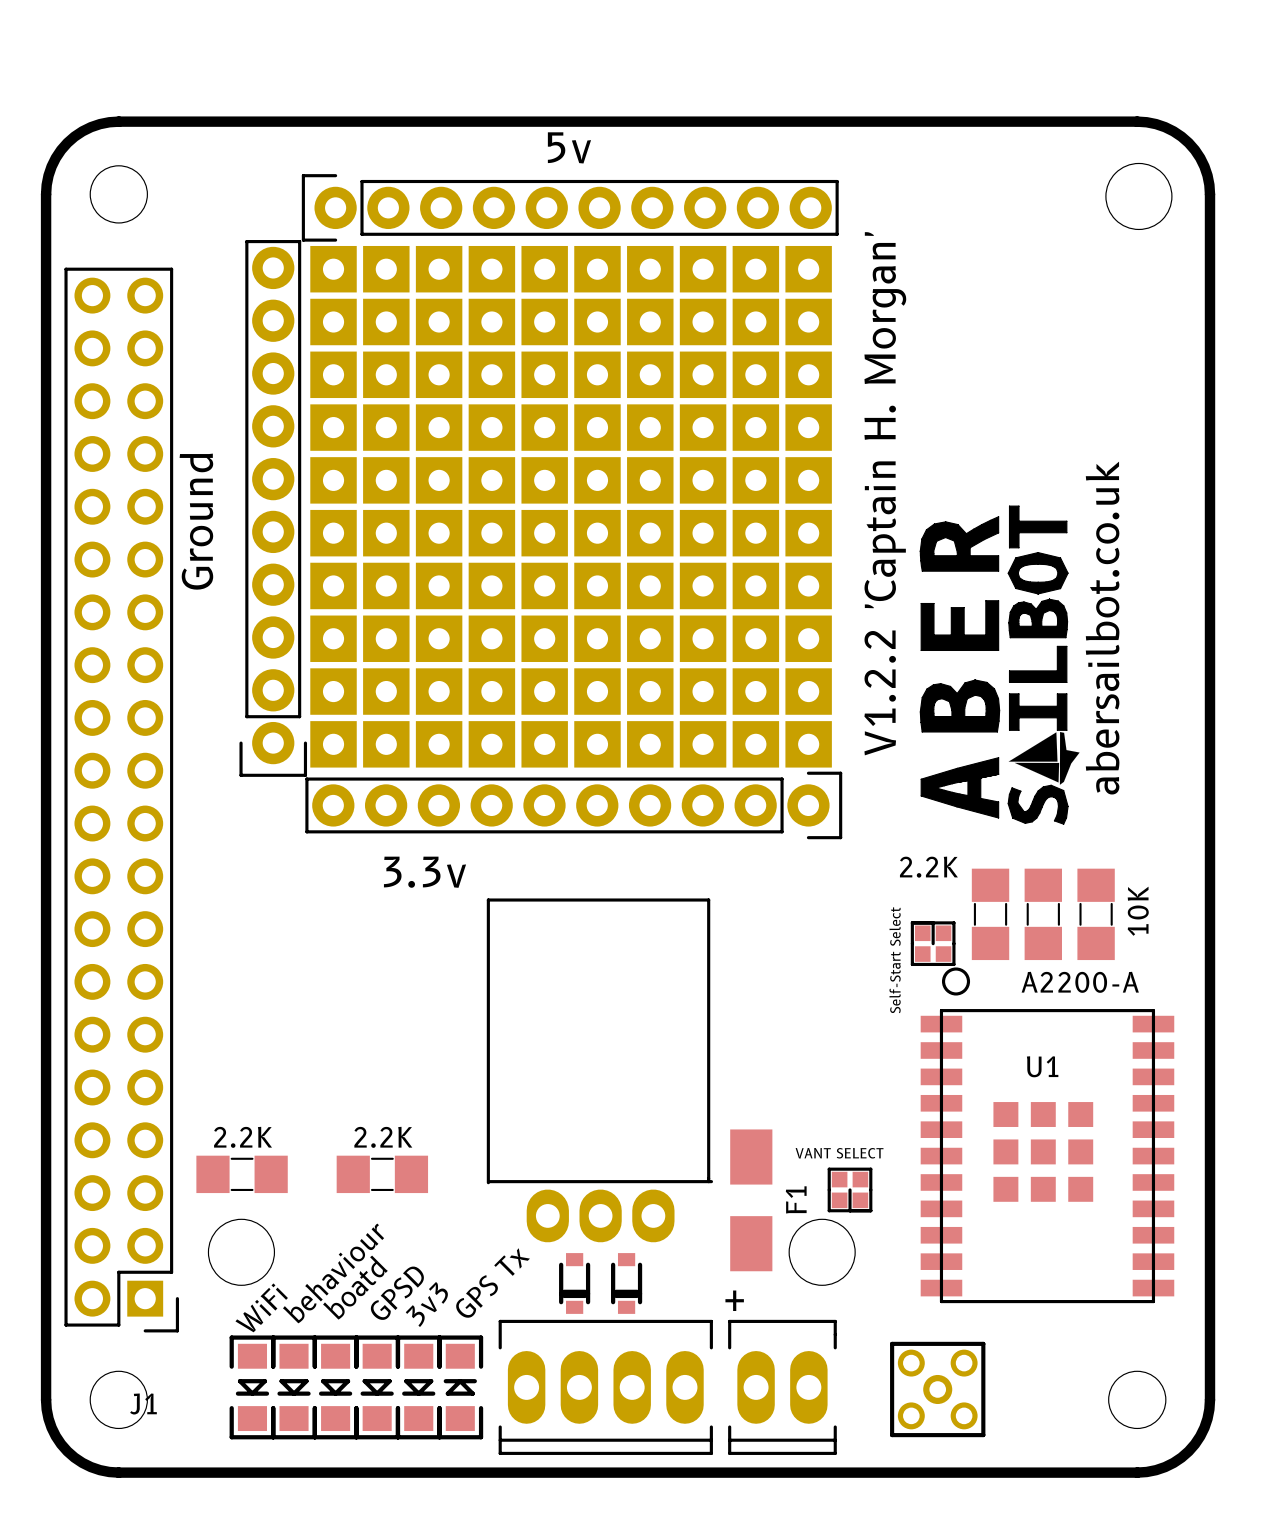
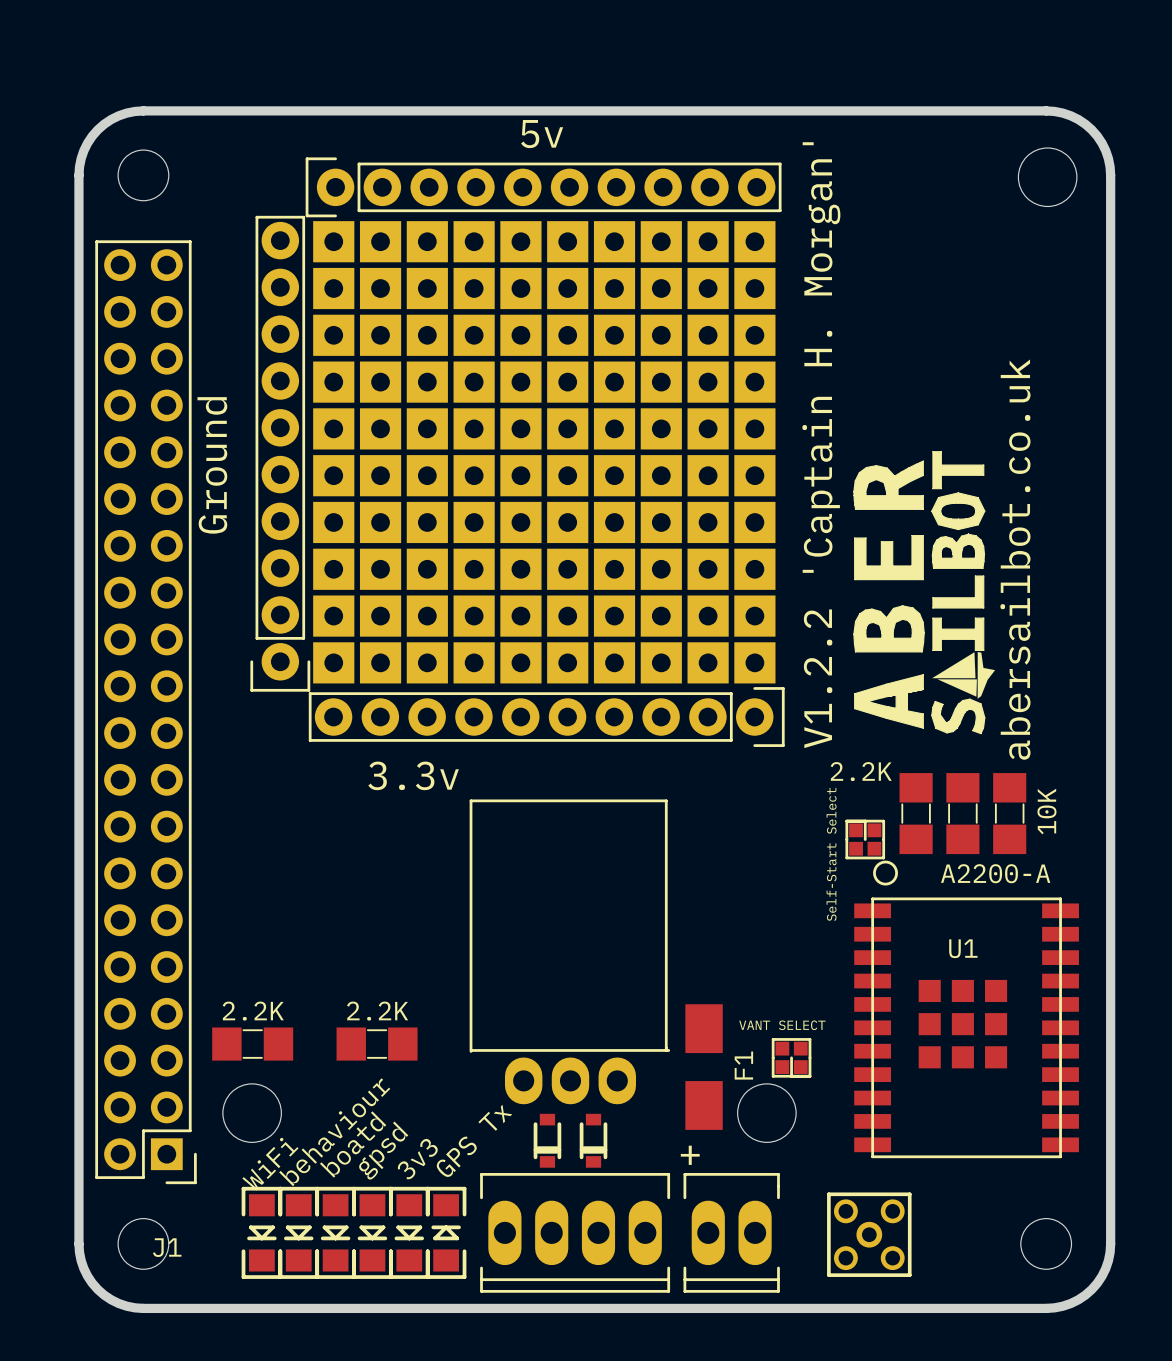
text: GPSD (397, 1293) -> gpsd (383, 1150)

